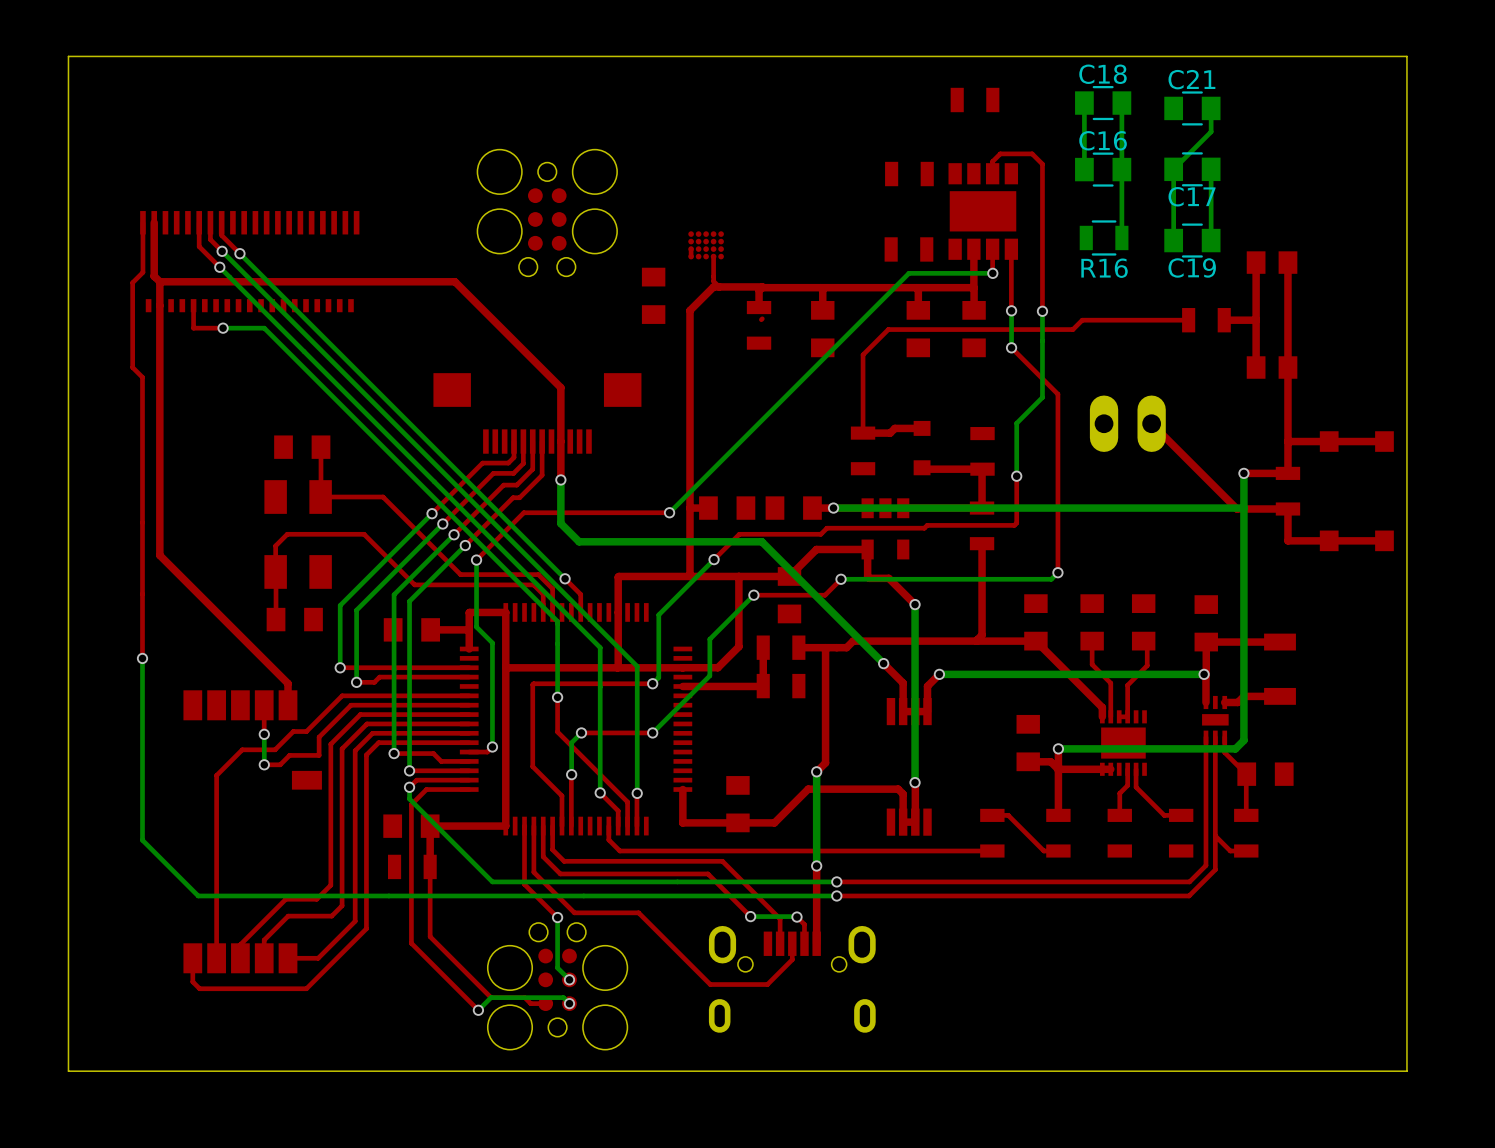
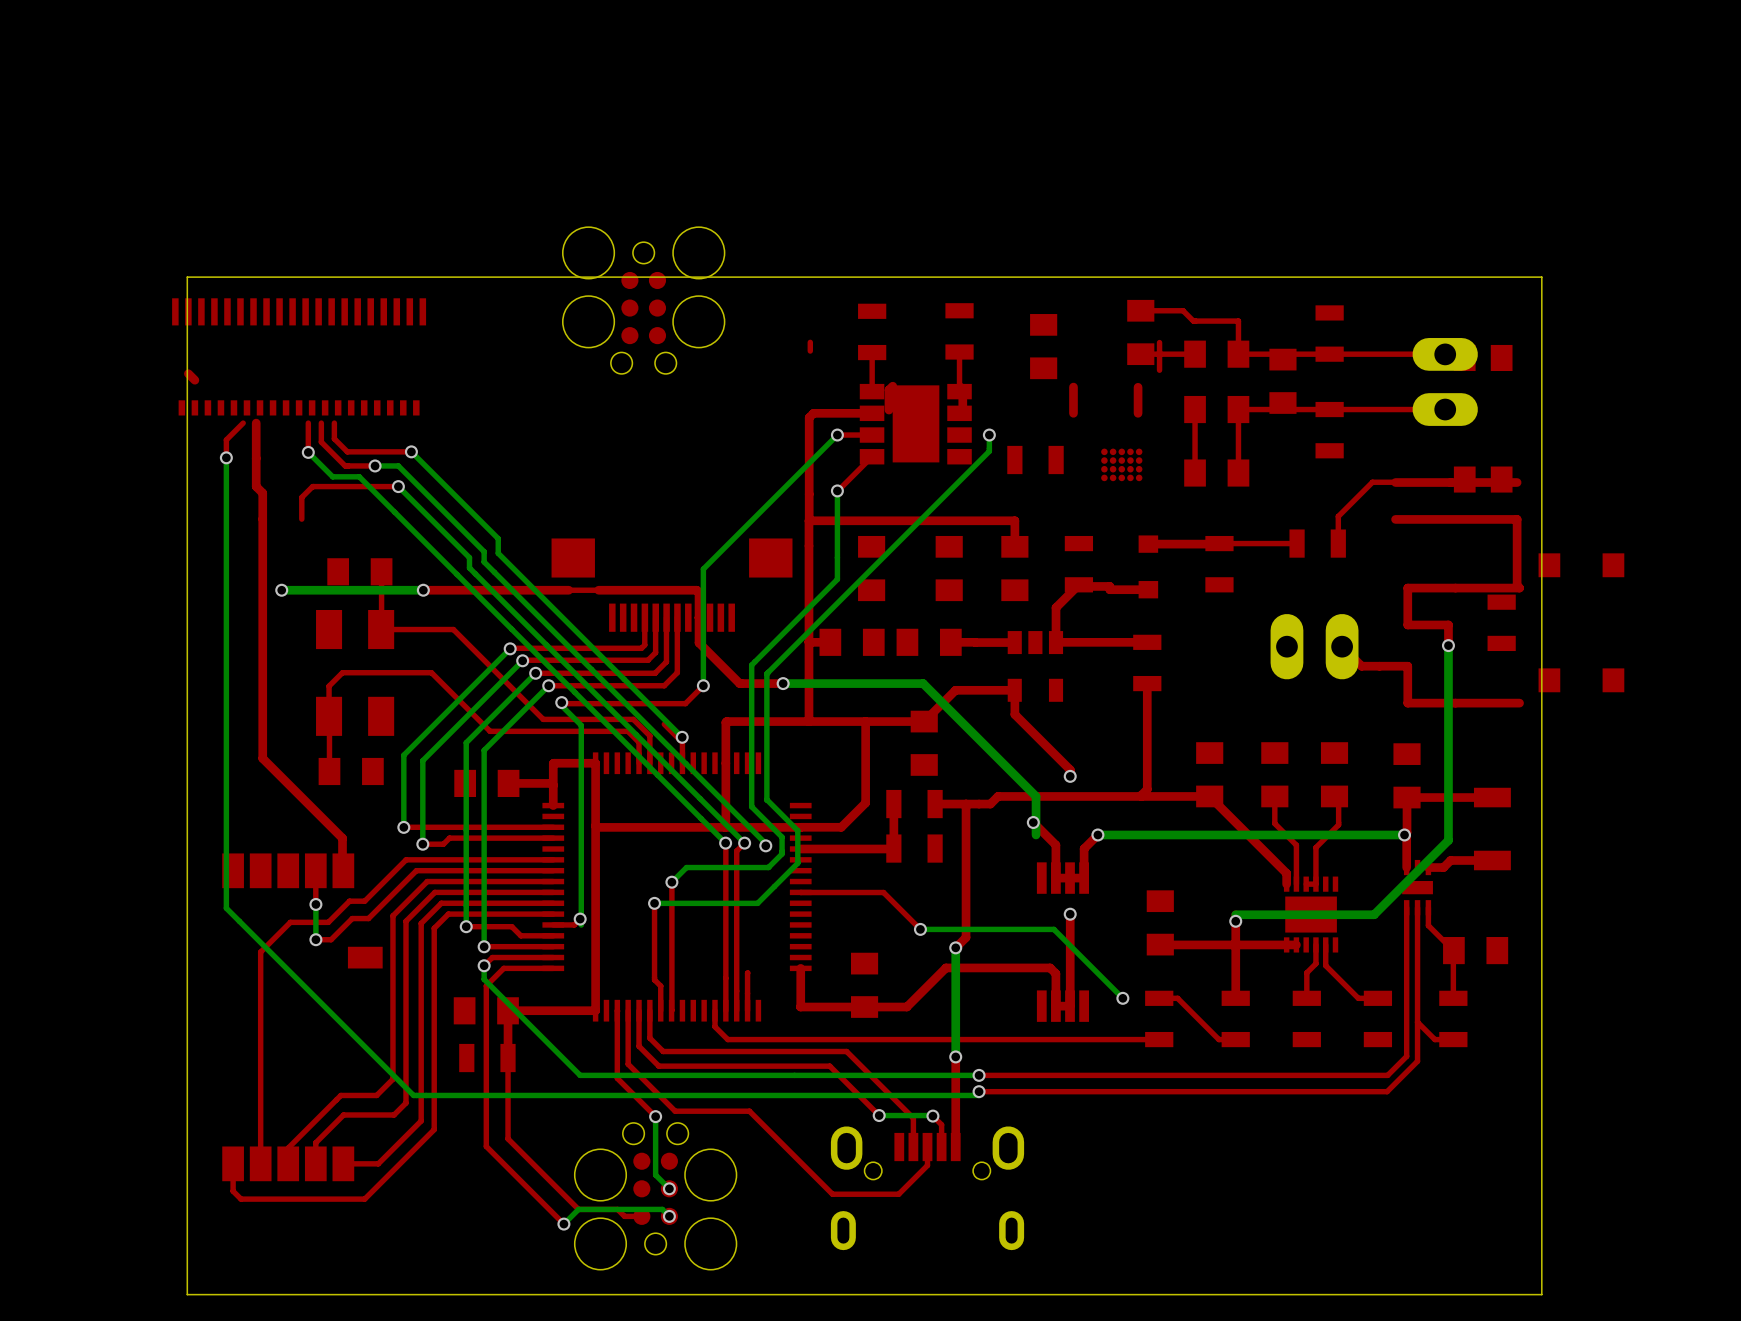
part: (975, 100) -> none
bottom track: (1084, 103) (1084, 169) -> none
C18 side: bottom (1103, 103) -> top (1216, 473)
bottom track: (1121, 103) (1121, 237) -> none
C21 side: bottom (1192, 108) -> top (1282, 381)
bottom track: (1211, 108) (1211, 131) (1173, 169) (1173, 240) -> none
C16 side: bottom (1103, 169) -> top (1216, 409)
C17 side: bottom (1192, 169) -> top (1140, 332)
bottom track: (1211, 169) (1211, 240) -> none
top track: (992, 173) (992, 161) (1000, 153) (1032, 153) (1042, 164) (1042, 311) -> none
part: (909, 174) -> none
part rotation: 0° (983, 211) -> 90° clockwise (915, 424)
part position: (983, 211) -> (915, 424)
top track: none -> (1140, 310) (1183, 310) (1193, 321) (1238, 321) (1238, 354) (1445, 354)
top track: (142, 222) (142, 272) (132, 282) (132, 367) (142, 377) (142, 658) -> none
top track: (154, 222) (154, 276) -> none
top track: (199, 222) (199, 246) (219, 267) -> none
top track: (210, 222) (210, 239) (222, 251) -> none
top track: (221, 222) (221, 235) (239, 253) -> none
part footprint: [884, 237, 934, 262] -> [1030, 314, 1058, 380]
R16 side: bottom (1104, 237) -> top (1329, 430)
part: none -> (959, 331)
part: none -> (872, 331)
C19 side: bottom (1192, 240) -> top (1216, 354)
part: none -> (1329, 333)
part position: (706, 245) -> (1121, 464)
top track: (973, 249) (973, 287) (713, 286) (689, 310) (689, 403) -> none
top track: (1011, 249) (1011, 310) -> none
bottom track: (222, 251) (409, 438) -> (375, 465) (398, 465) (484, 551) (484, 562)
via: (222, 251) -> none
bottom track: (239, 253) (565, 578) -> none
via: (239, 253) -> none
top track: (713, 256) (713, 281) (719, 286) -> none
top track: none -> (872, 352) (872, 391)
top track: none -> (959, 352) (959, 391)
top track: none -> (1195, 354) (1140, 354)
top track: (1256, 262) (1256, 367) -> none
top track: (1287, 262) (1287, 473) (1243, 473) -> none
bottom track: (219, 267) (600, 647) (600, 792) -> none
via: (219, 267) -> none
bottom track: (992, 273) (908, 273) (669, 512) -> none
via: (992, 273) -> none
part: none -> (1445, 381)
part: (653, 295) -> none
top track: (193, 305) (193, 328) (223, 328) -> none
top track: none -> (1195, 409) (1195, 473)
top track: none -> (1445, 409) (1238, 409) (1238, 473)
top track: none -> (872, 413) (813, 413) (809, 417) (809, 520) (1014, 520) (1014, 546)
bottom track: (1011, 310) (1011, 347) -> none
via: (1011, 310) -> none
bottom track: (1042, 311) (1042, 397) (1016, 423) (1016, 476) -> none
via: (1042, 311) -> none
top track: none -> (243, 423) (226, 439) (226, 457)
top track: none -> (256, 423) (256, 486) (262, 493) (262, 758) (342, 838) (342, 869)
top track: none -> (308, 423) (308, 452)
top track: none -> (321, 423) (321, 442) (345, 465) (375, 465)
top track: none -> (334, 423) (334, 438) (347, 451) (411, 451)
top track: (762, 318) (761, 319) -> none
top track: (1255, 319) (1224, 320) -> none
top track: (1188, 320) (1082, 320) (1072, 329) (888, 329) (863, 354) (863, 433) (890, 433) (894, 428) (922, 428) -> none
part: (1206, 320) -> none
part: (759, 325) -> none
bottom track: (223, 328) (264, 328) (557, 621) (557, 697) -> none
via: (223, 328) -> none
bottom track: none -> (837, 435) (703, 569) (703, 685)
via: none -> (837, 435)
top track: none -> (872, 435) (837, 435)
part: (822, 329) -> none
bottom track: none -> (989, 435) (989, 451) (766, 673) (766, 800)
via: none -> (989, 435)
part: (918, 329) -> none
part: (974, 329) -> none
bottom track: none -> (411, 451) (498, 538) (498, 553) (682, 737)
via: none -> (411, 451)
bottom track: none -> (308, 452) (332, 476) (359, 476) (725, 843)
via: none -> (308, 452)
top track: none -> (872, 456) (837, 490)
top track: (1011, 347) (1057, 394) (1057, 572) -> none
via: (1011, 347) -> none
bottom track: none -> (226, 457) (226, 908) (413, 1095) (979, 1095)
via: none -> (226, 457)
part: none -> (1035, 460)
via: none -> (375, 465)
top track: none -> (1395, 482) (1372, 482) (1338, 516) (1338, 543)
top track: none -> (1517, 482) (1395, 482)
top track: none -> (398, 486) (312, 486) (301, 497) (301, 519)
bottom track: none -> (398, 486) (469, 557) (469, 567) (744, 843)
via: none -> (398, 486)
bottom track: none -> (837, 490) (837, 579) (751, 665) (751, 806) (782, 837) (782, 853) (768, 867) (686, 867) (671, 882)
via: none -> (837, 490)
part footprint: [1089, 395, 1166, 452] -> [1289, 529, 1346, 558]
top track: none -> (1395, 519) (1517, 519) (1517, 585) (1519, 588) (1407, 588) (1407, 624) (1448, 624) (1448, 645)
part position: (537, 413) -> (672, 585)
part footprint: [913, 420, 931, 476] -> [1064, 535, 1094, 593]
top track: none -> (1297, 543) (1148, 544)
top track: (1151, 423) (1236, 509) (1287, 509) (1287, 540) (1384, 540) -> none
part footprint: [850, 426, 876, 476] -> [1001, 535, 1029, 602]
part footprint: [970, 427, 995, 476] -> [1138, 535, 1159, 599]
part: none -> (1219, 564)
top track: (514, 441) (514, 457) (508, 463) -> (783, 683) (739, 683) (699, 642) (699, 592) (696, 590) (598, 590)
top track: (523, 441) (523, 463) (513, 473) (493, 473) (443, 523) -> (655, 618) (655, 652) (648, 660) (523, 660)
top track: (532, 441) (532, 469) (516, 485) (503, 485) (454, 534) -> (666, 617) (666, 661) (655, 673) (535, 673)
top track: (542, 441) (542, 475) (519, 497) (513, 497) (465, 545) -> (677, 617) (677, 672) (664, 685) (548, 685)
top track: (1384, 441) (1287, 441) -> none
part: none -> (871, 568)
part: none -> (949, 568)
top track: none -> (1148, 589) (1109, 589) (1109, 586) (1080, 586) (1078, 584) (1056, 607) (1056, 642)
via: none -> (281, 590)
bottom track: none -> (423, 590) (281, 590)
via: none -> (423, 590)
top track: (482, 463) (432, 513) -> (644, 617) (644, 645) (641, 648) (510, 648)
top track: none -> (568, 590) (423, 590)
top track: (922, 467) (982, 469) (982, 508) -> none
bottom track: (1243, 473) (1243, 740) (1235, 748) (1058, 748) -> none
via position: (1243, 473) -> (1448, 645)
top track: (1016, 476) (1016, 523) (1014, 525) (826, 528) (820, 534) (739, 534) (714, 559) -> none
via: (1016, 476) -> none
top track: (560, 479) (560, 387) (454, 281) (159, 281) (159, 555) (288, 683) (288, 705) -> none
bottom track: (560, 479) (560, 523) (579, 541) (761, 541) (883, 663) -> none
via: (560, 479) -> none
via: (833, 508) -> none
bottom track: (1243, 508) (833, 508) -> none
bottom track: none -> (1448, 645) (1448, 840) (1374, 914) (1235, 914)
part: none -> (1314, 646)
top track: none -> (1342, 646) (1361, 666) (1407, 666) (1407, 703) (1519, 703)
top track: (669, 512) (523, 512) (476, 560) -> none
via: (669, 512) -> none
bottom track: none -> (783, 683) (923, 683) (1036, 796) (1036, 834)
via: none -> (783, 683)
top track: none -> (703, 685) (685, 703) (559, 703)
via: none -> (703, 685)
top track: (867, 549) (867, 576) (888, 578) (915, 604) -> (1014, 690) (1014, 714) (1070, 769) (1070, 776)
bottom track: (714, 559) (658, 614) (658, 677) (652, 683) -> none
via: (714, 559) -> none
bottom track: (476, 560) (476, 627) (492, 642) (492, 746) -> none
bottom track: none -> (559, 703) (581, 725) (581, 925)
bottom track: (1057, 572) (1051, 579) (841, 579) -> none
via: (1057, 572) -> none
via position: (565, 578) -> (682, 737)
top track: (841, 579) (825, 595) (753, 595) -> none
via: (841, 579) -> none
bottom track: (753, 595) (709, 639) (709, 675) (652, 732) -> none
via: (753, 595) -> none
bottom track: (915, 604) (915, 782) -> none
via position: (915, 604) -> (1070, 776)
bottom track: none -> (766, 799) (797, 830) (797, 863) (757, 903) (654, 903)
bottom track: (142, 658) (142, 840) (198, 895) (836, 895) -> none
via: (142, 658) -> none
bottom track: (637, 666) (637, 793) -> (747, 825) (765, 843)
via: none -> (725, 843)
via: none -> (744, 843)
top track: (652, 683) (532, 684) (532, 766) (561, 795) (561, 804) -> (654, 903) (654, 979) (660, 986)
top track: (557, 697) (557, 732) (627, 801) -> (744, 843) (736, 851) (736, 982)
via: (557, 697) -> none
via: none -> (671, 882)
top track: none -> (800, 892) (883, 892) (920, 929)
bottom track: (581, 732) (571, 742) (571, 774) -> none
via: (581, 732) -> none
top track: (652, 732) (581, 732) -> none
via: (652, 732) -> none
via: none -> (654, 903)
top track: (319, 737) (319, 755) (289, 755) (280, 764) (277, 764) -> (379, 907) (368, 918) (352, 918) (331, 939)
via: none -> (1070, 914)
part position: (1028, 743) -> (1160, 922)
bottom track: none -> (920, 929) (1053, 929) (1122, 998)
via: none -> (920, 929)
top track: (1028, 761) (1050, 761) (1058, 769) -> (1160, 944) (1235, 944)
top track: (571, 774) (571, 826) -> (671, 882) (671, 1010)
via: (571, 774) -> none
top track: (915, 782) (915, 822) -> (1070, 914) (1070, 1005)
via: (915, 782) -> none
top track: (600, 792) (618, 810) -> (725, 843) (725, 993)
via: (600, 792) -> none
via: (637, 793) -> none
via: none -> (1122, 998)
board edge: (1322, 1071) (1406, 1071) (1406, 56) (68, 56) (68, 1071) (153, 1071) -> (1541, 1294) (1541, 277) (187, 277) (187, 1294)

